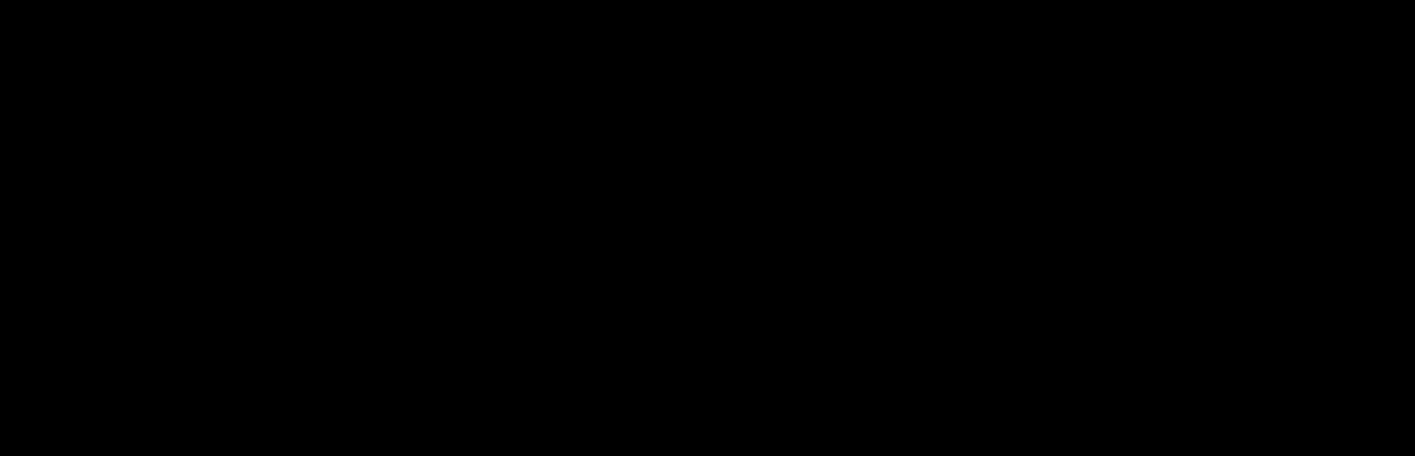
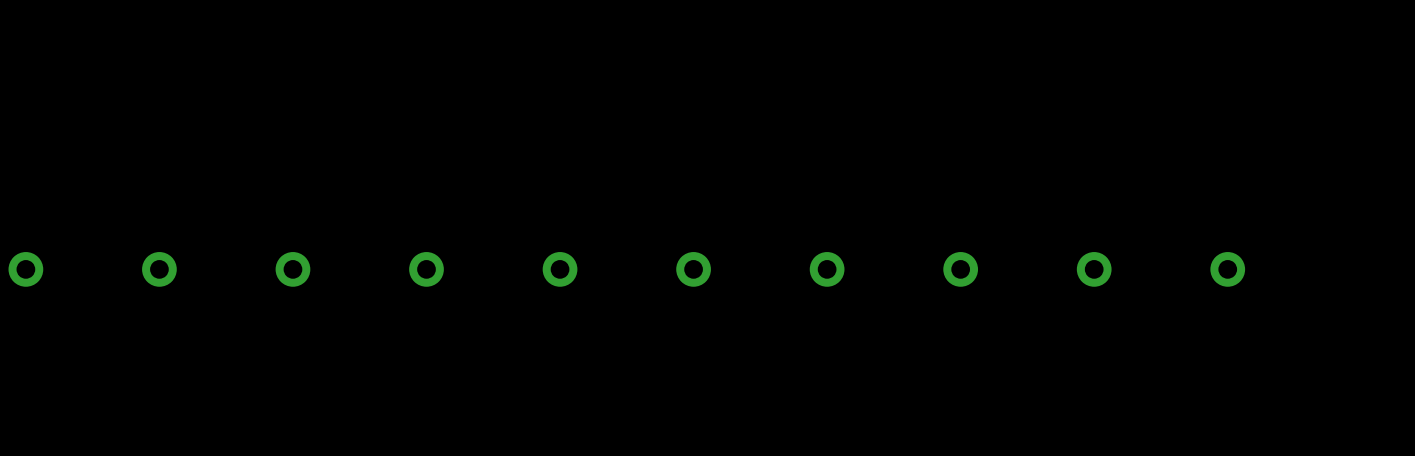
via: none -> (25, 269)
via: none -> (159, 269)
via: none -> (292, 269)
via: none -> (426, 269)
via: none -> (560, 269)
via: none -> (693, 269)
via: none -> (827, 269)
via: none -> (960, 269)
via: none -> (1094, 269)
via: none -> (1227, 269)

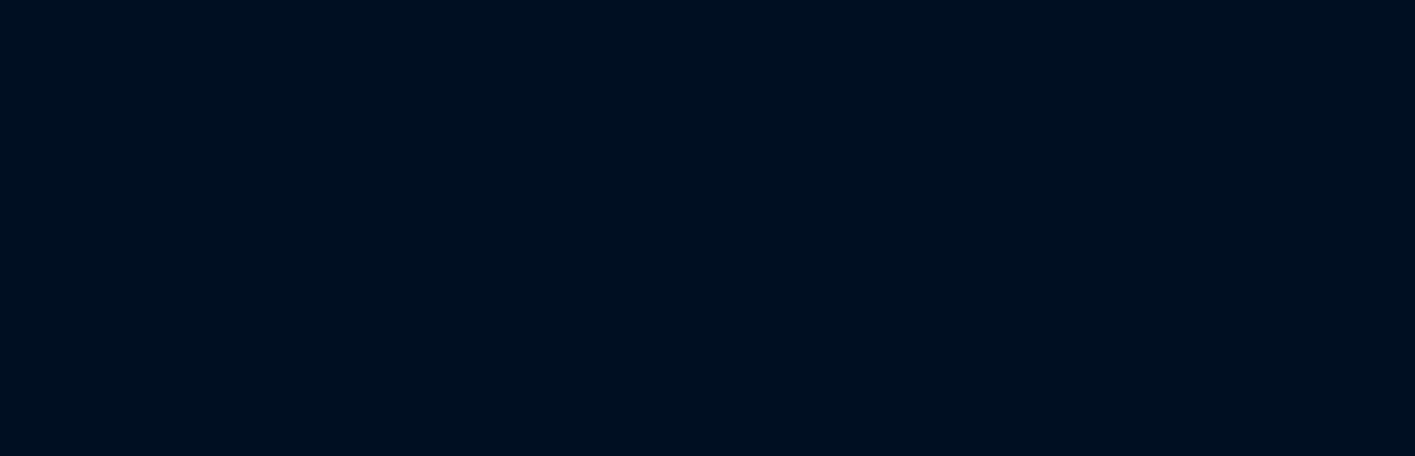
via: (25, 269) -> none
via: (159, 269) -> none
via: (292, 269) -> none
via: (426, 269) -> none
via: (560, 269) -> none
via: (693, 269) -> none
via: (827, 269) -> none
via: (960, 269) -> none
via: (1094, 269) -> none
via: (1227, 269) -> none

